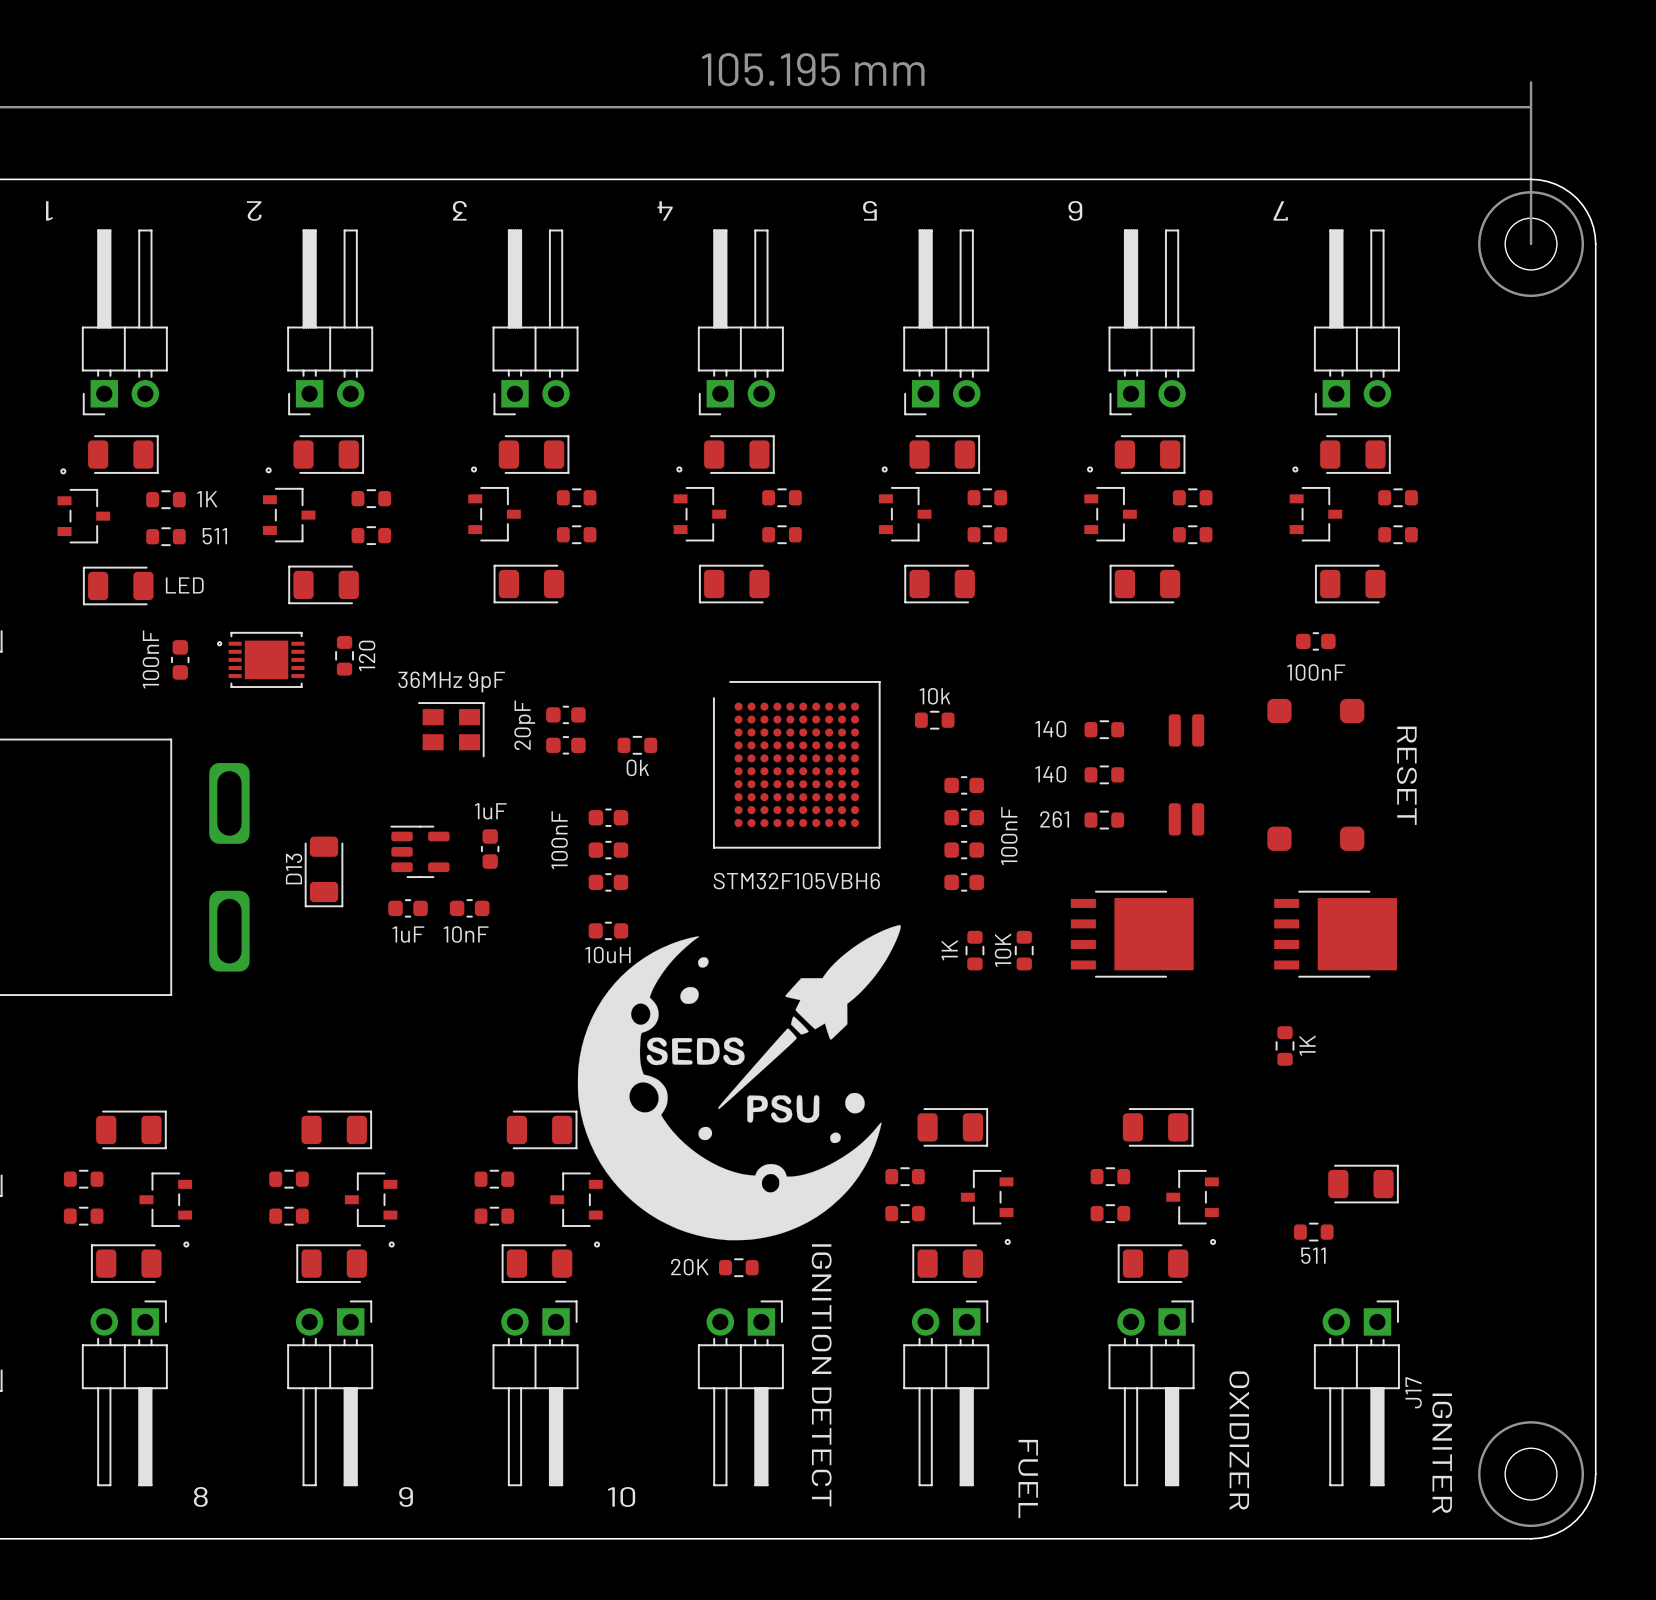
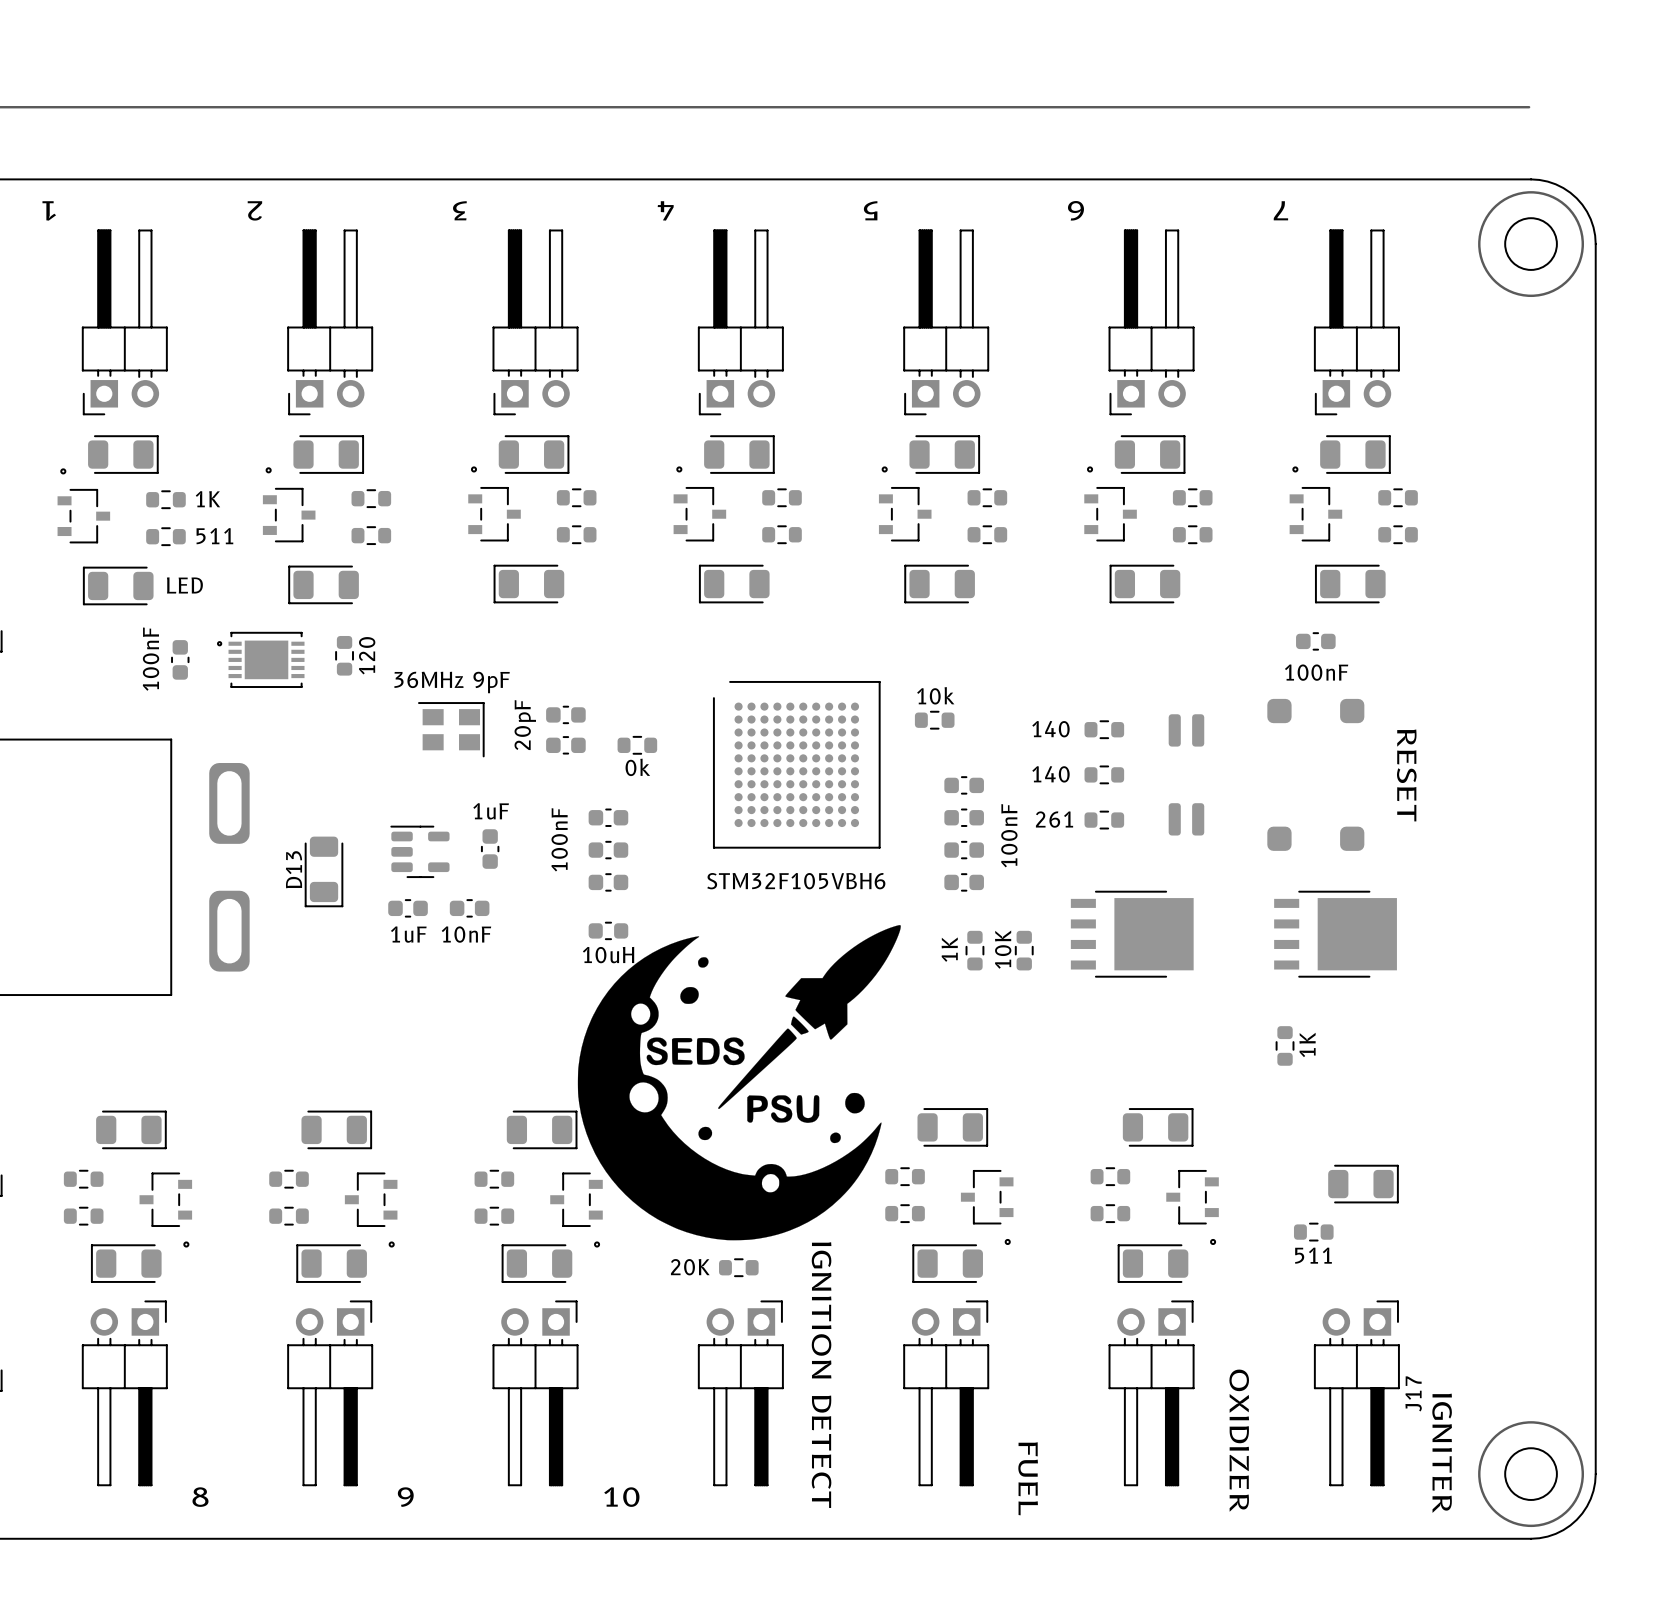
text: 105.195 mm (813, 69) -> none
line: (1531, 82) (1531, 244) -> none

